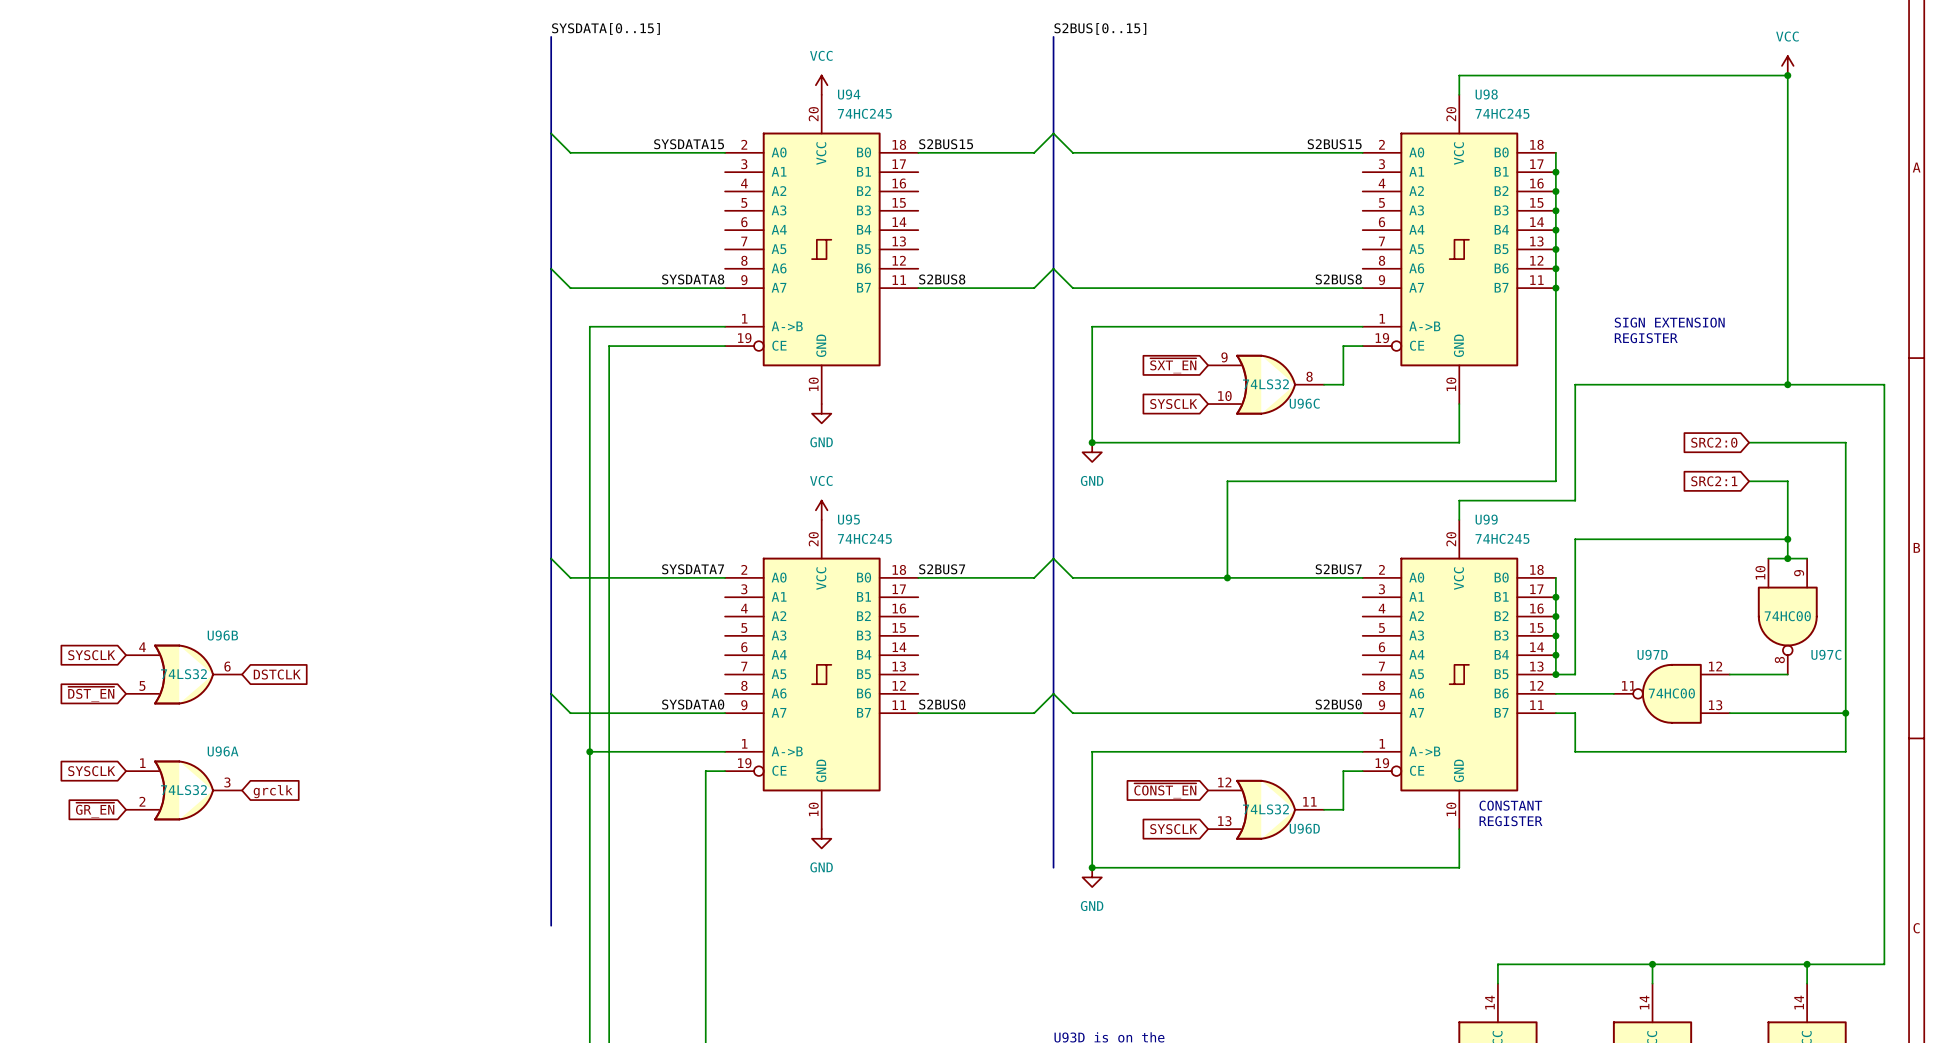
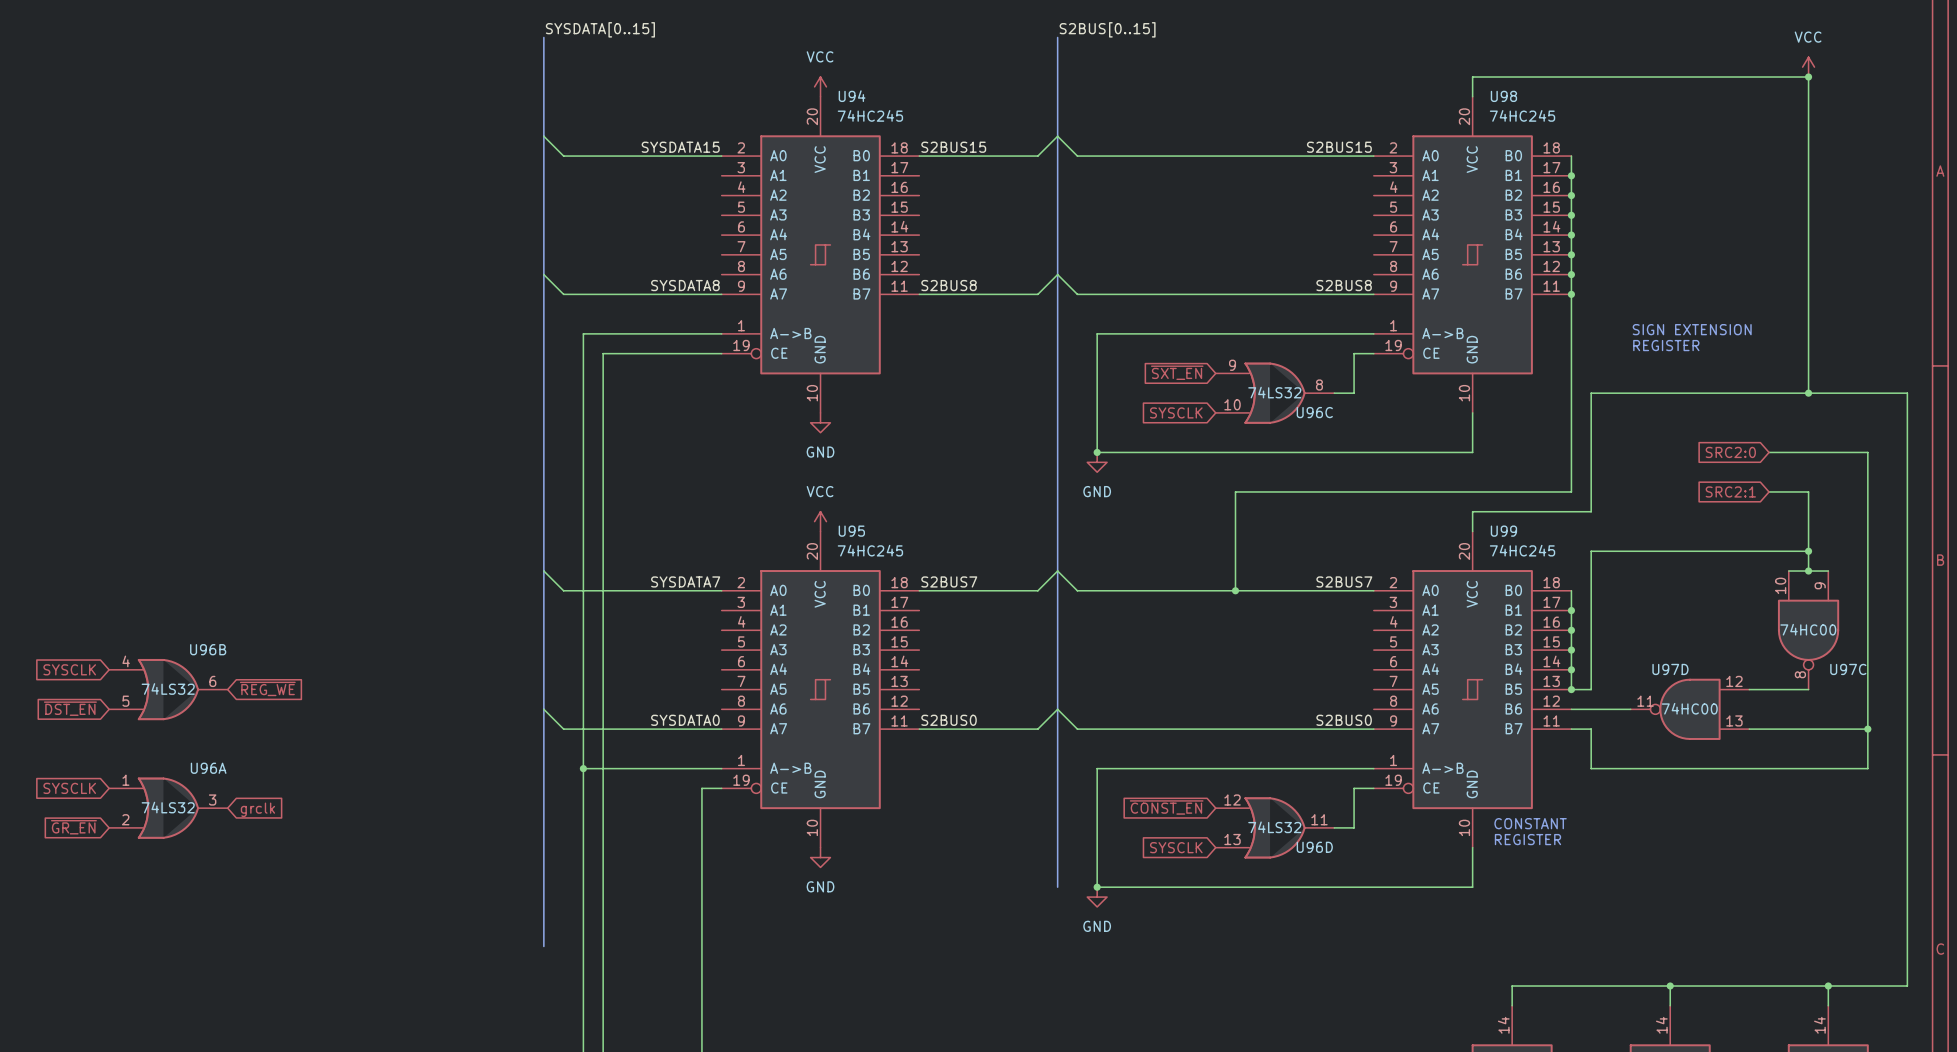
global label: DSTCLK (277, 674) -> ~{REG_WE} (267, 688)

